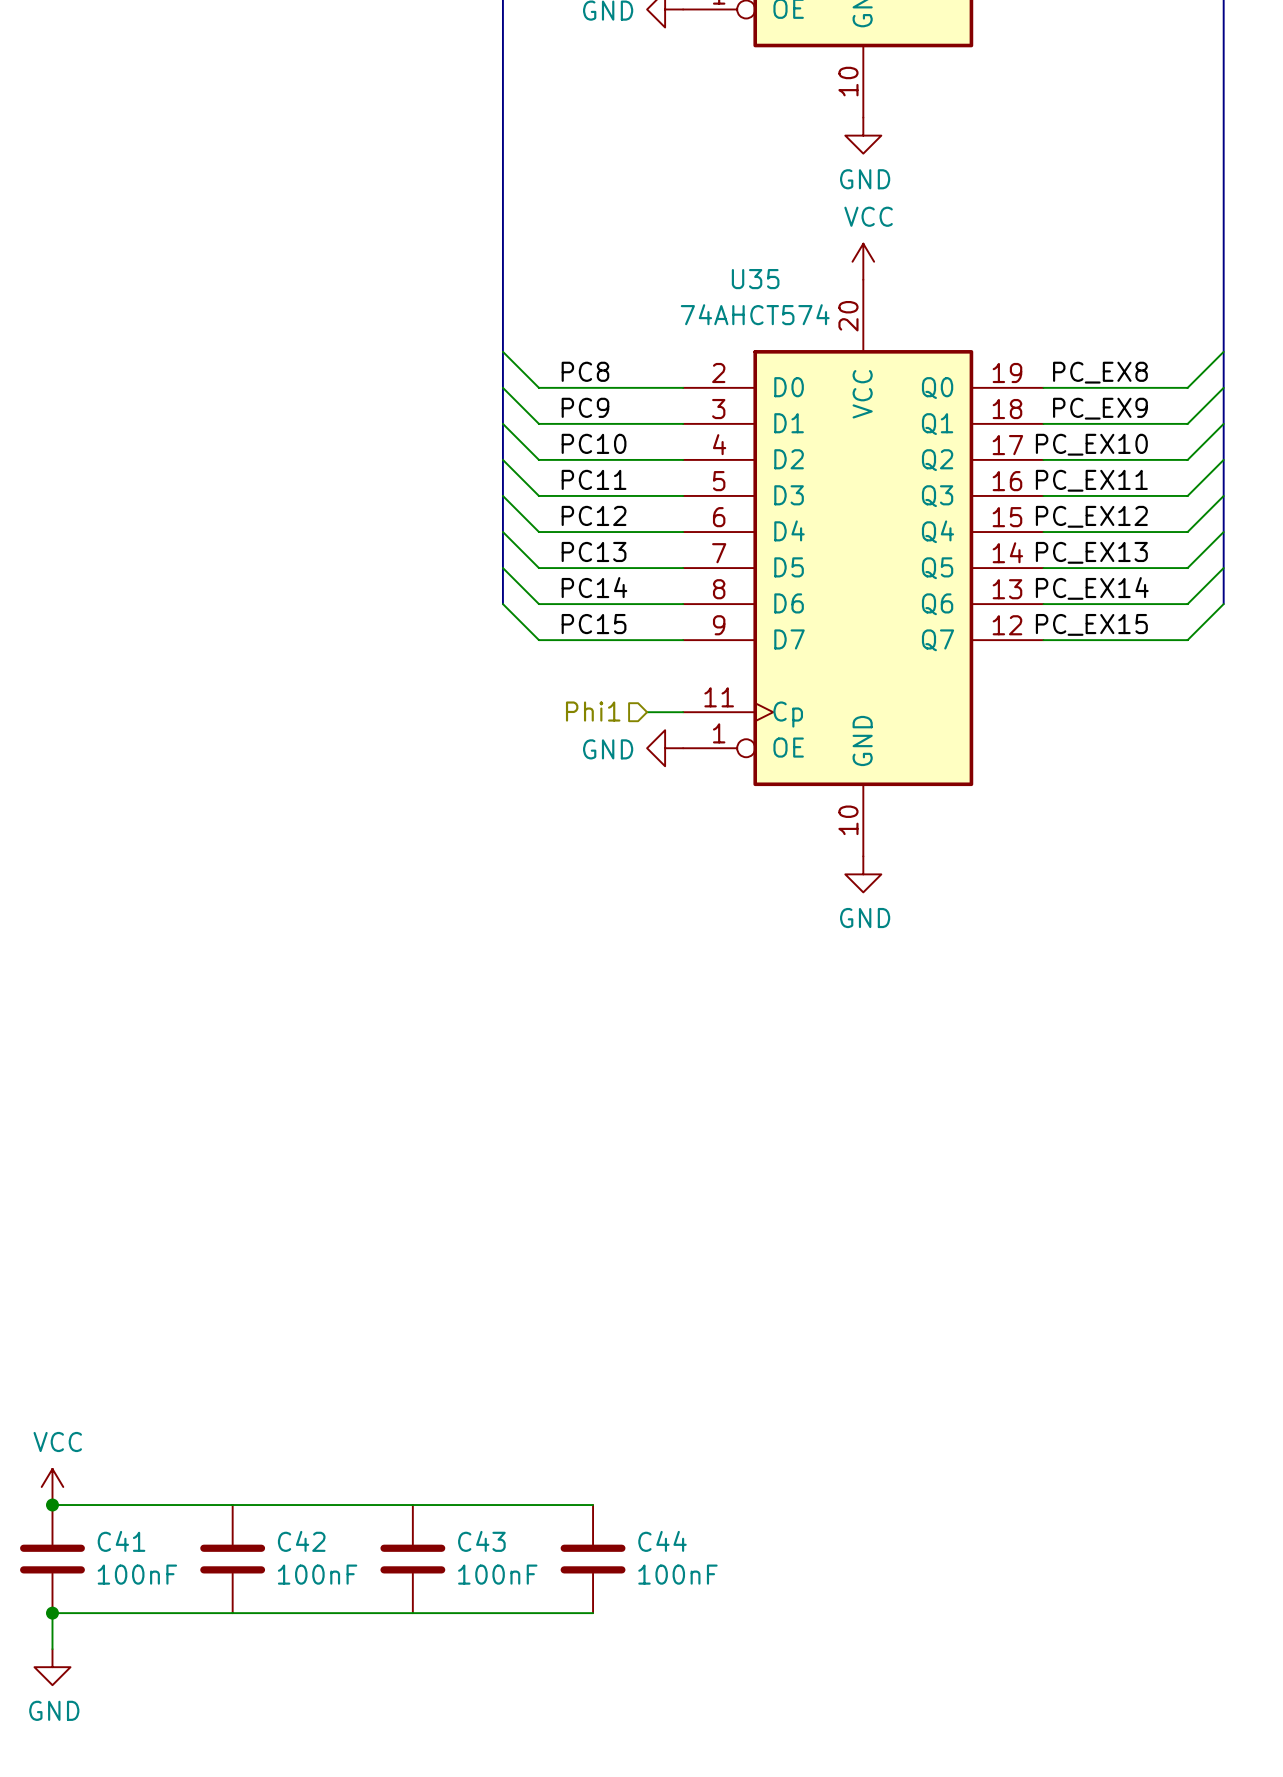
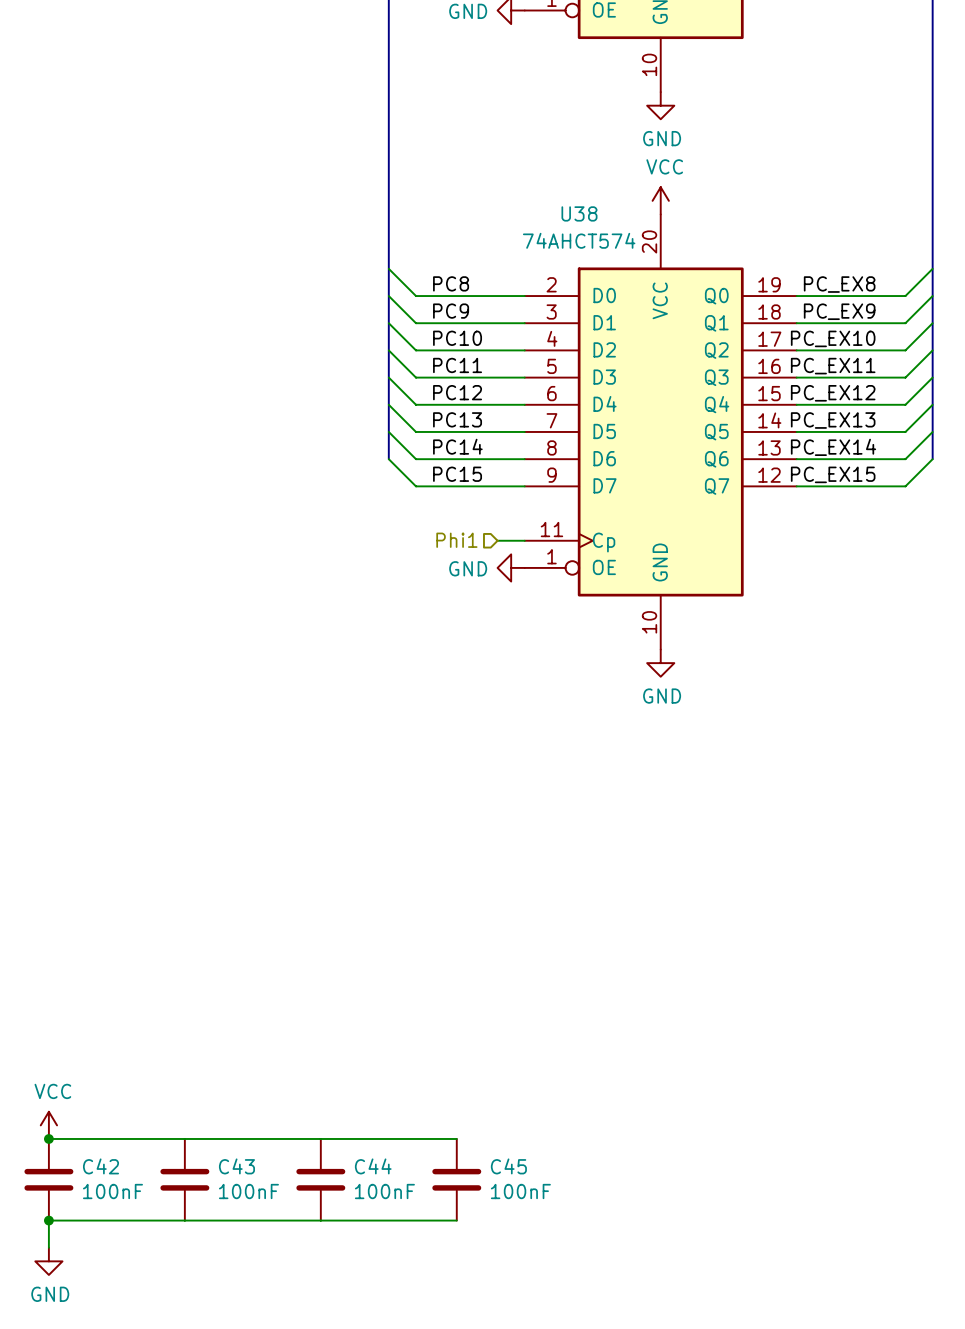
U35 name: U35 (755, 279) -> U38 (579, 213)
C41 name: C41 (121, 1541) -> C42 (100, 1166)
C42 name: C42 (301, 1541) -> C43 (236, 1166)
C43 name: C43 (481, 1541) -> C44 (373, 1166)
C44 name: C44 (662, 1541) -> C45 (508, 1166)

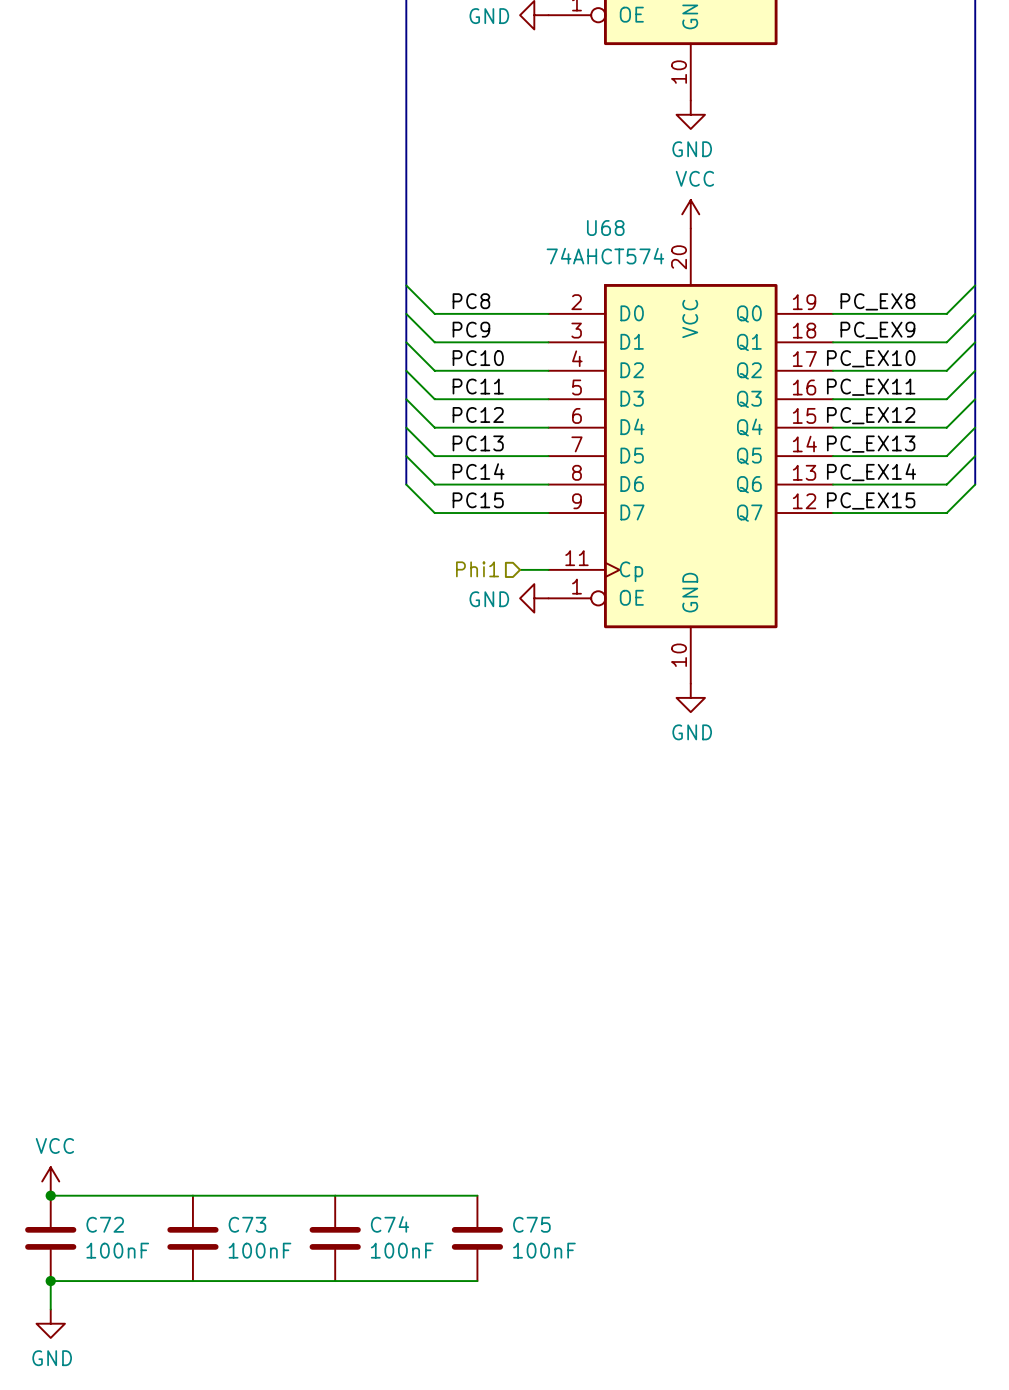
U38 name: U38 (579, 213) -> U68 (605, 228)
C42 name: C42 (100, 1166) -> C72 (105, 1224)
C43 name: C43 (236, 1166) -> C73 (247, 1224)
C44 name: C44 (373, 1166) -> C74 (390, 1224)
C45 name: C45 (508, 1166) -> C75 (531, 1224)

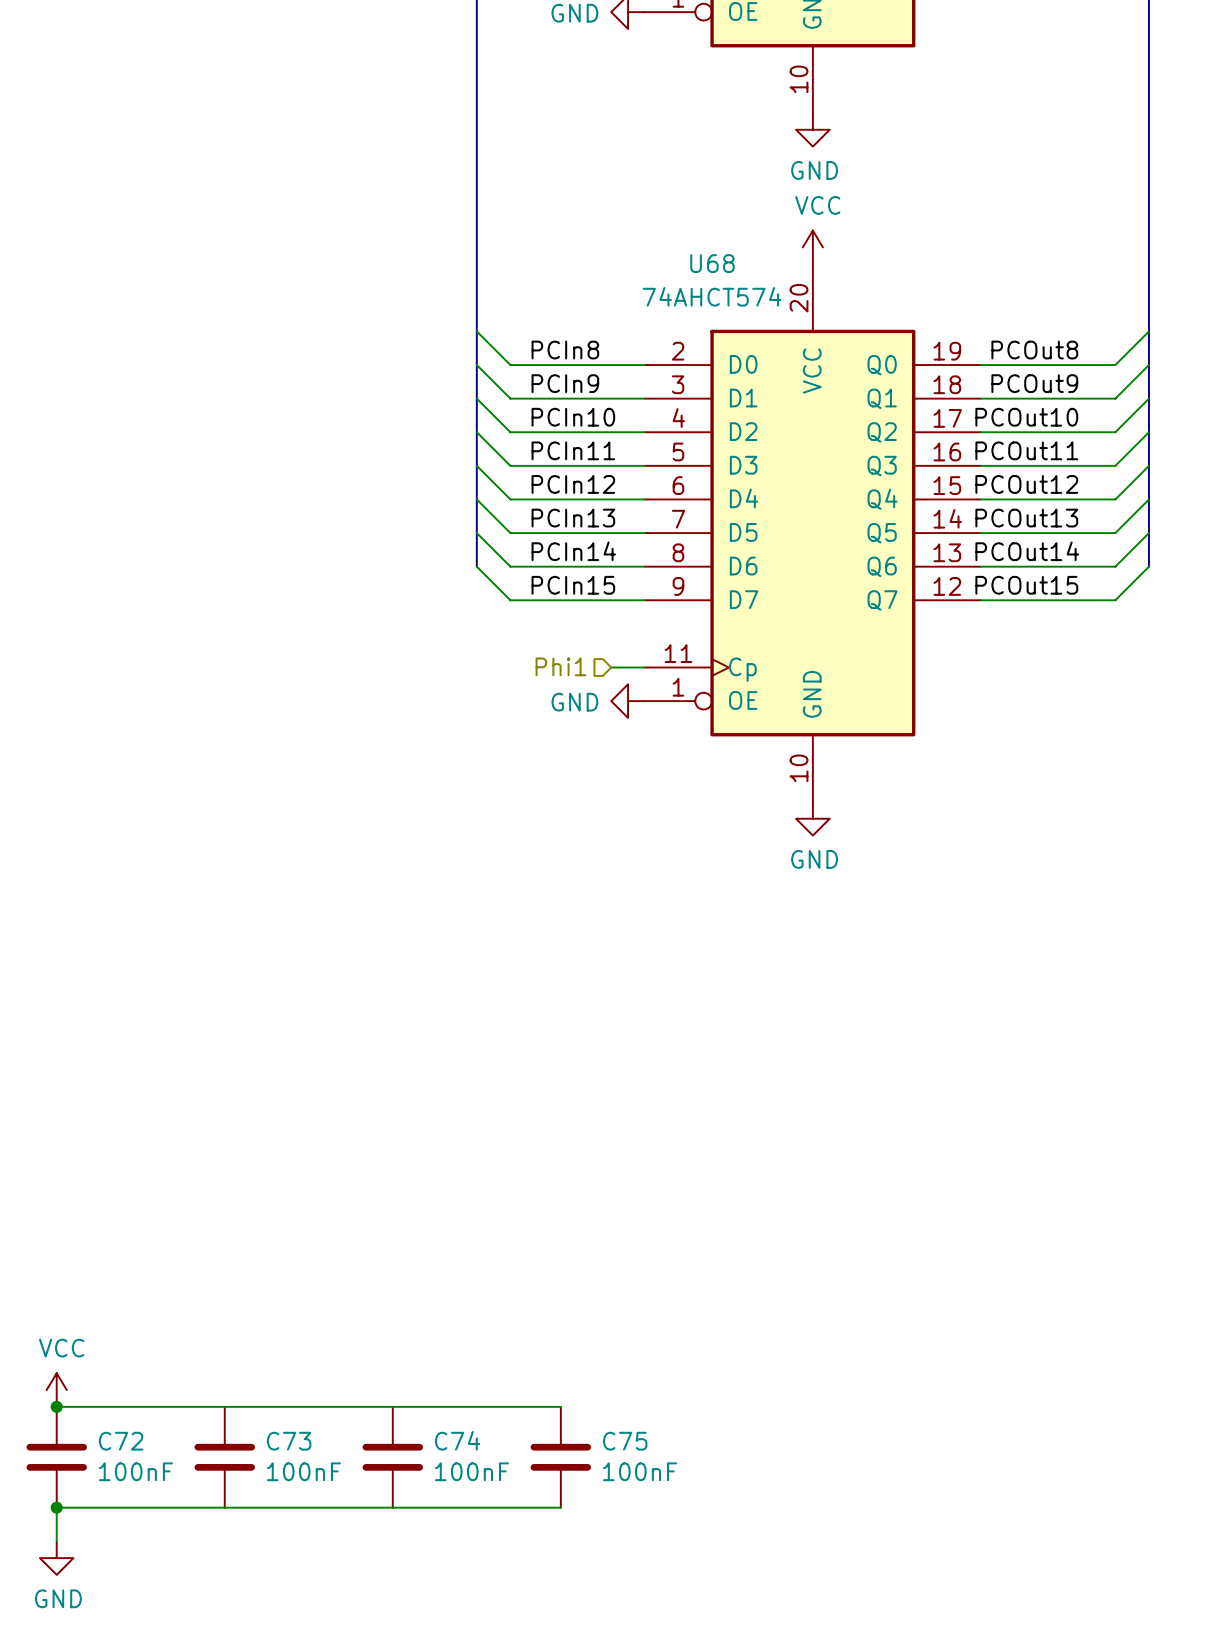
label: PC8 (471, 301) -> PCIn8 (565, 350)
label: PC_EX8 (877, 301) -> PCOut8 (1034, 350)
label: PC9 (471, 329) -> PCIn9 (565, 383)
label: PC_EX9 (877, 330) -> PCOut9 (1034, 383)
label: PC10 (478, 358) -> PCIn10 (573, 417)
label: PC_EX10 (871, 358) -> PCOut10 (1026, 417)
label: PC11 (478, 386) -> PCIn11 (573, 450)
label: PC_EX11 (871, 387) -> PCOut11 (1026, 450)
label: PC12 (478, 414) -> PCIn12 (573, 484)
label: PC_EX12 (871, 415) -> PCOut12 (1026, 484)
label: PC13 (478, 443) -> PCIn13 (573, 518)
label: PC_EX13 (871, 444) -> PCOut13 (1026, 518)
label: PC14 (478, 471) -> PCIn14 (573, 551)
label: PC_EX14 (871, 472) -> PCOut14 (1027, 551)
label: PC15 (478, 500) -> PCIn15 (573, 585)
label: PC_EX15 (871, 500) -> PCOut15 (1026, 585)

